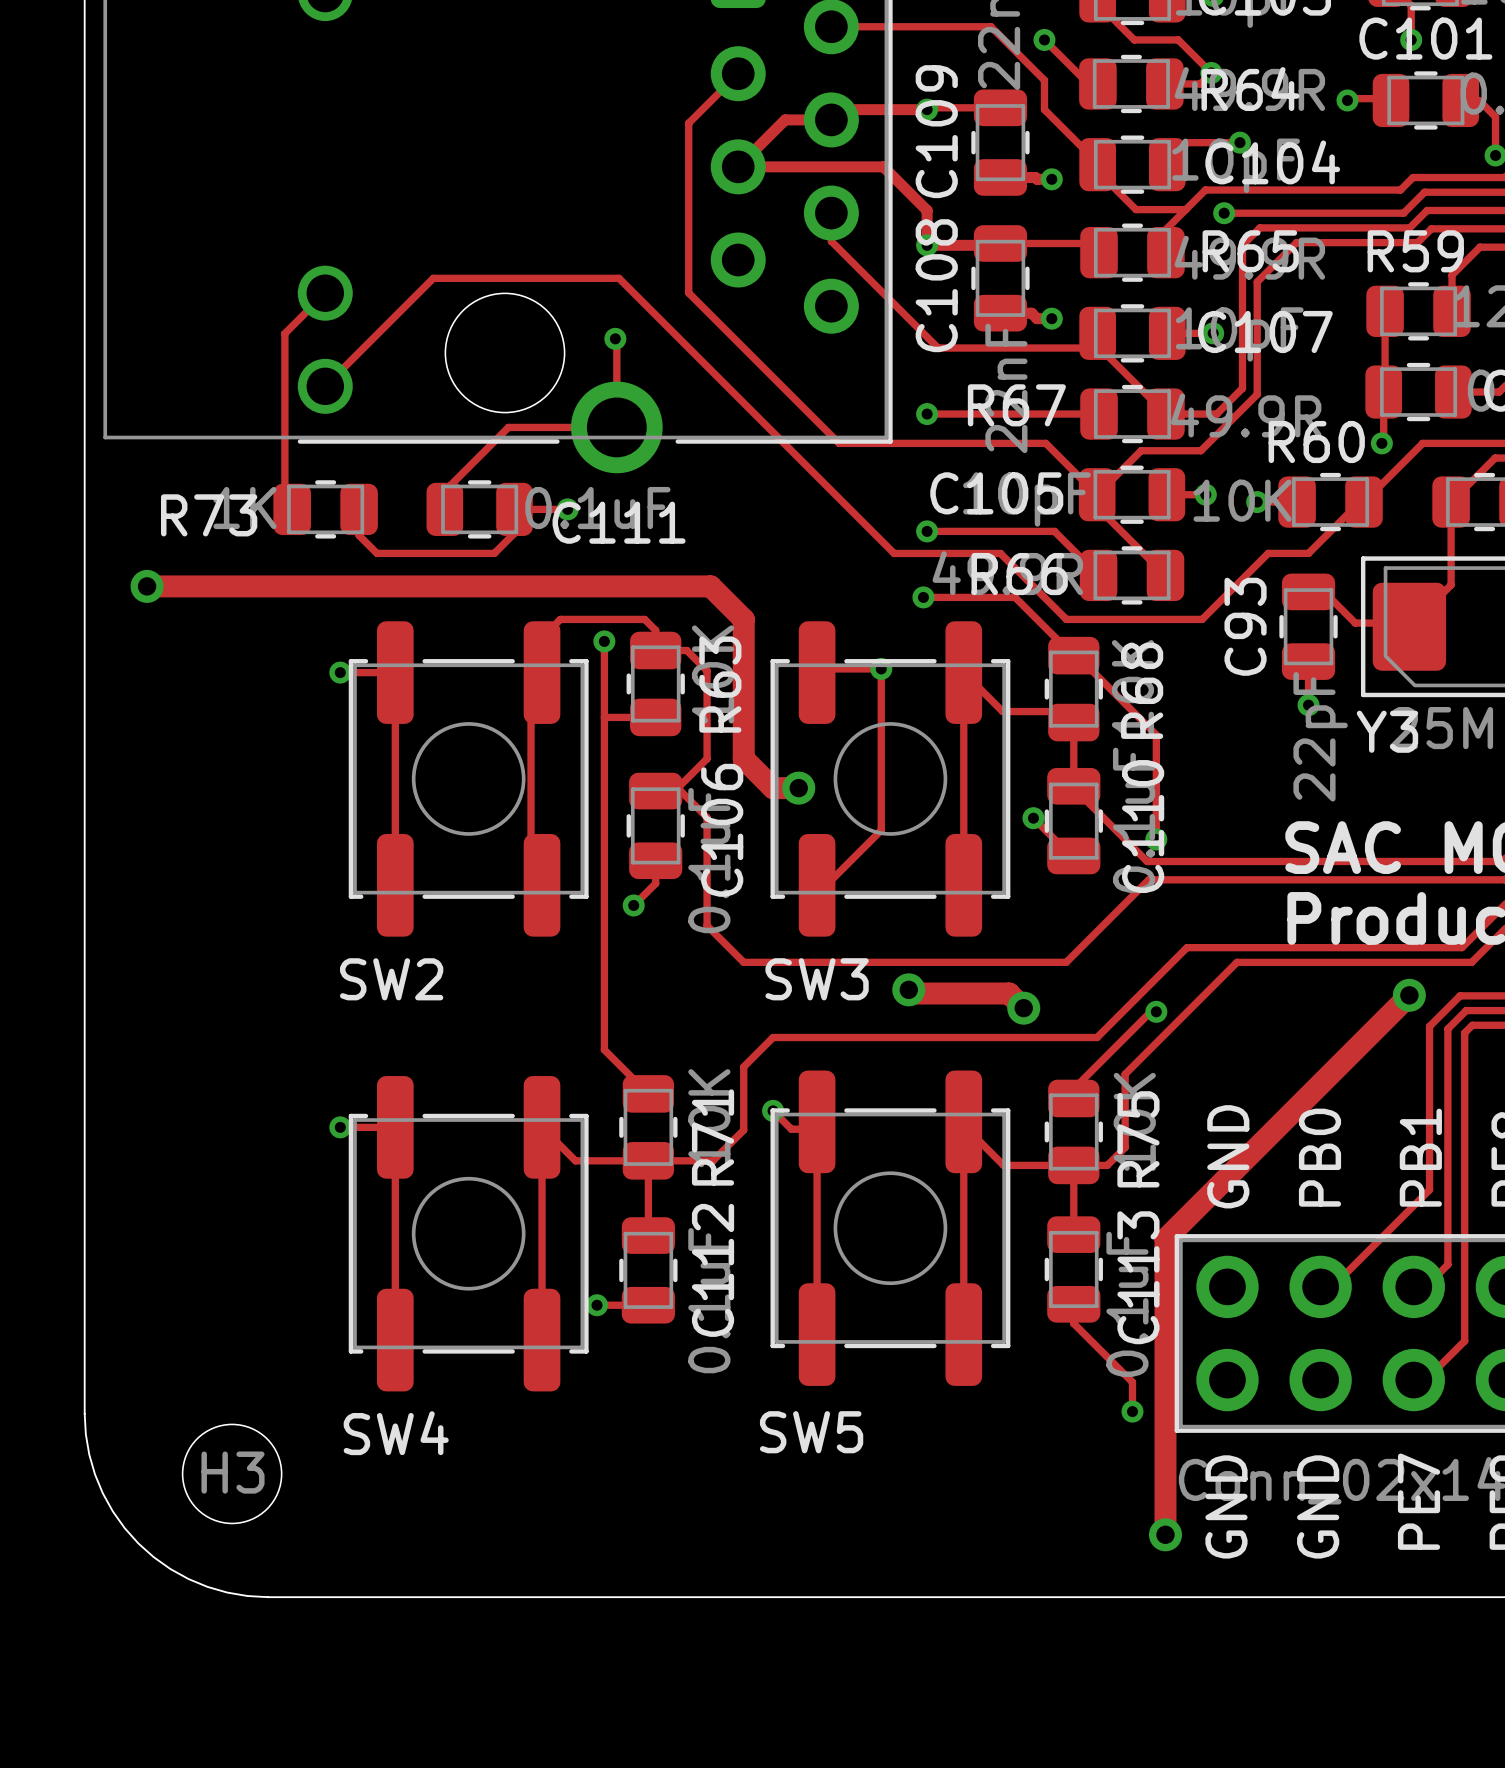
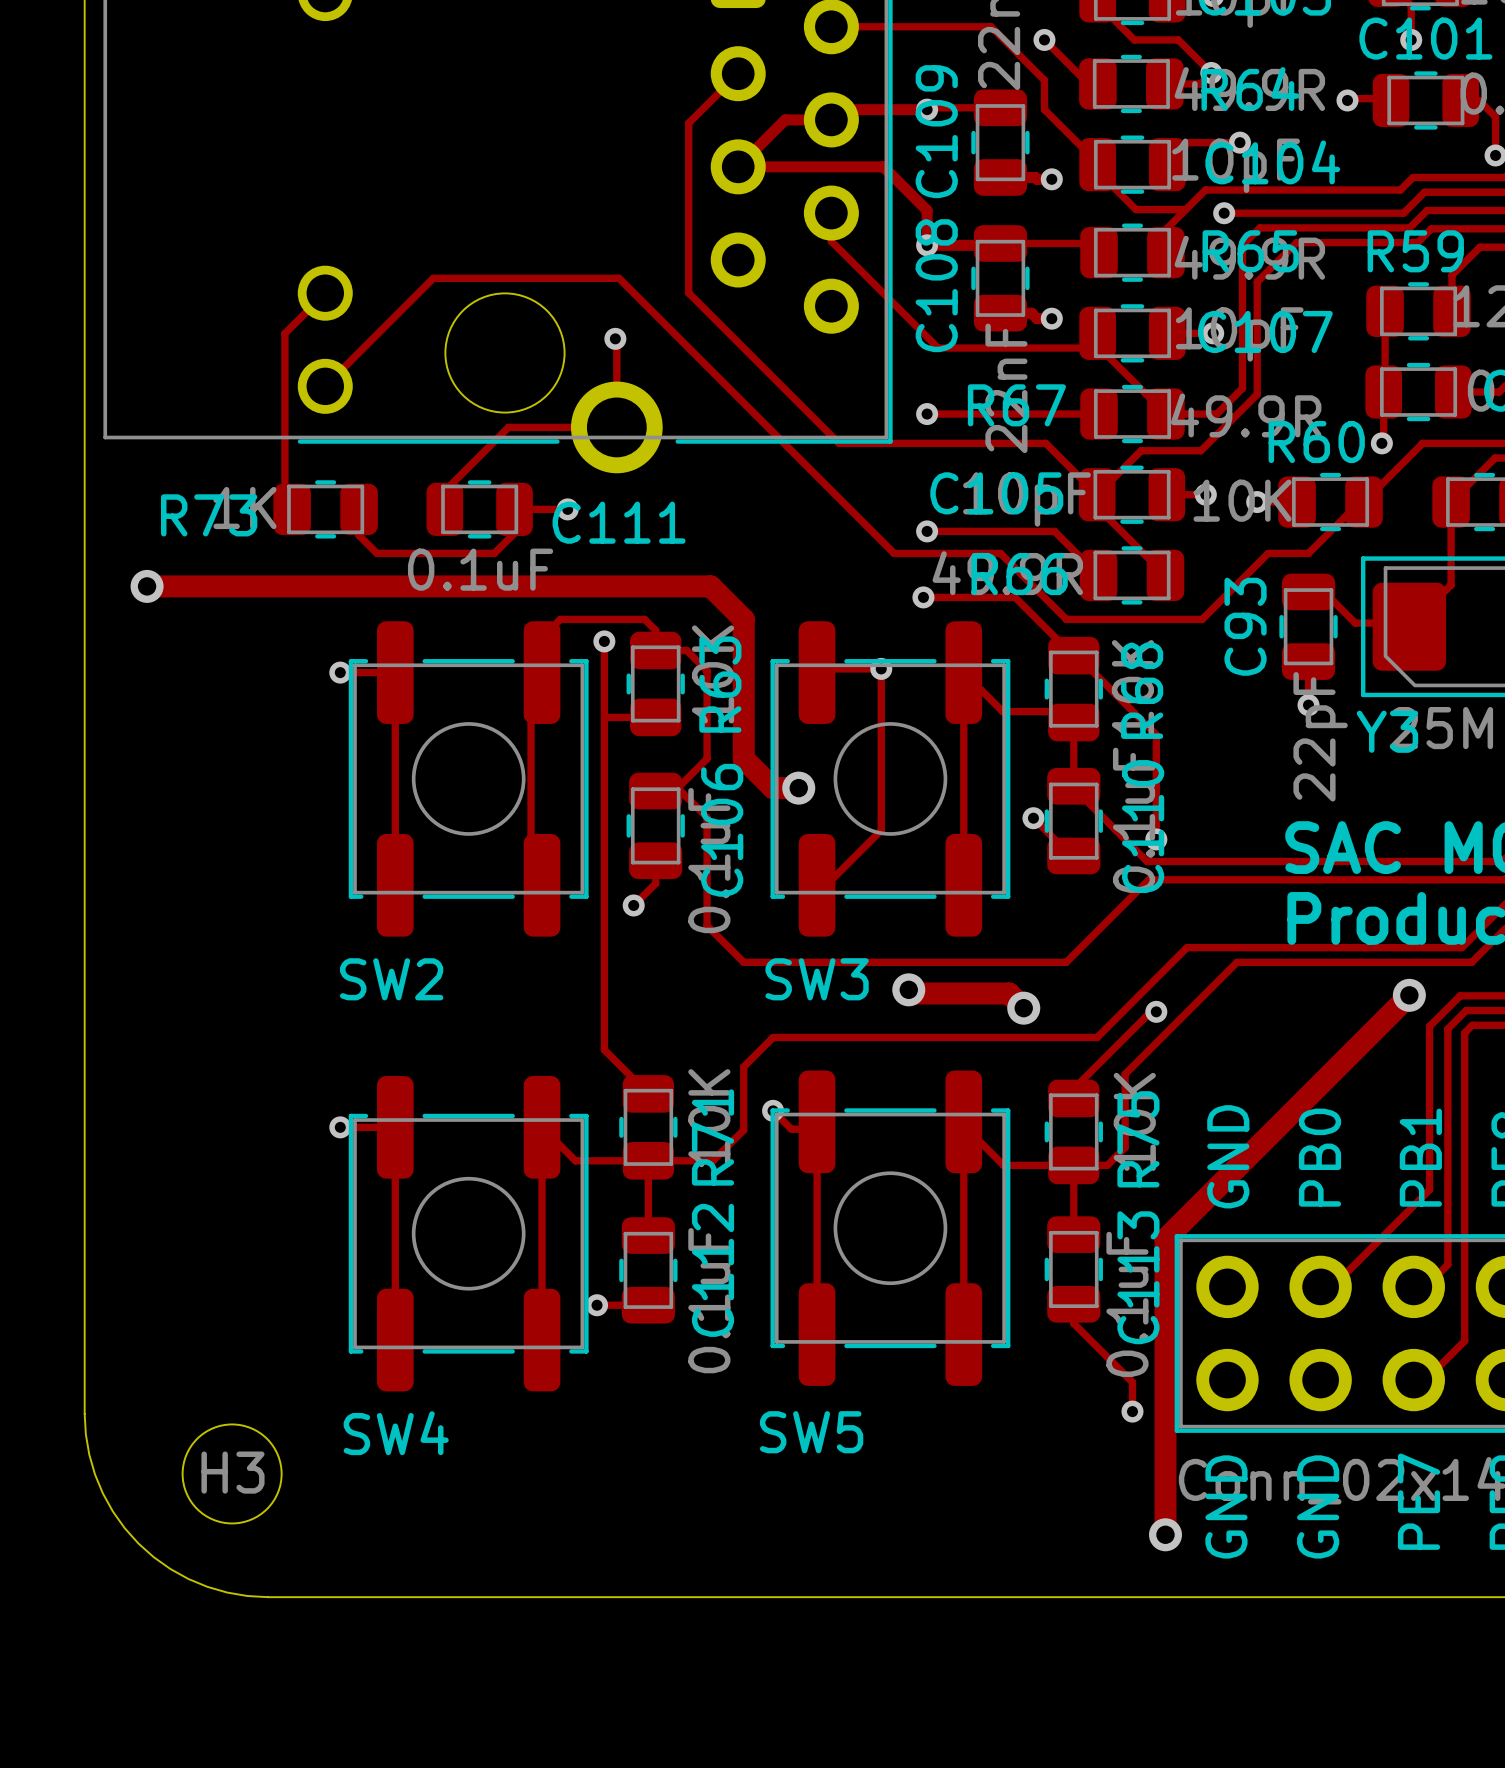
C111 value position: 0.1uF (597, 508) -> 0.1uF (480, 569)

